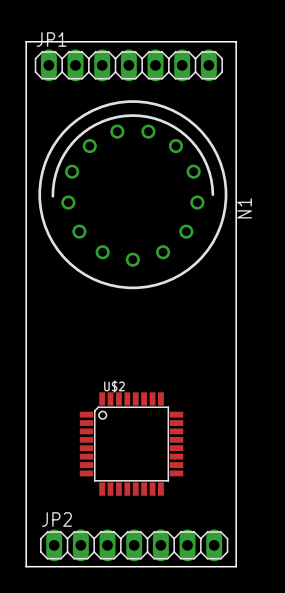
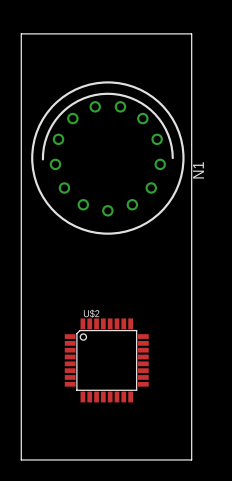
JP1: (128, 65) -> none
JP2: (134, 545) -> none

